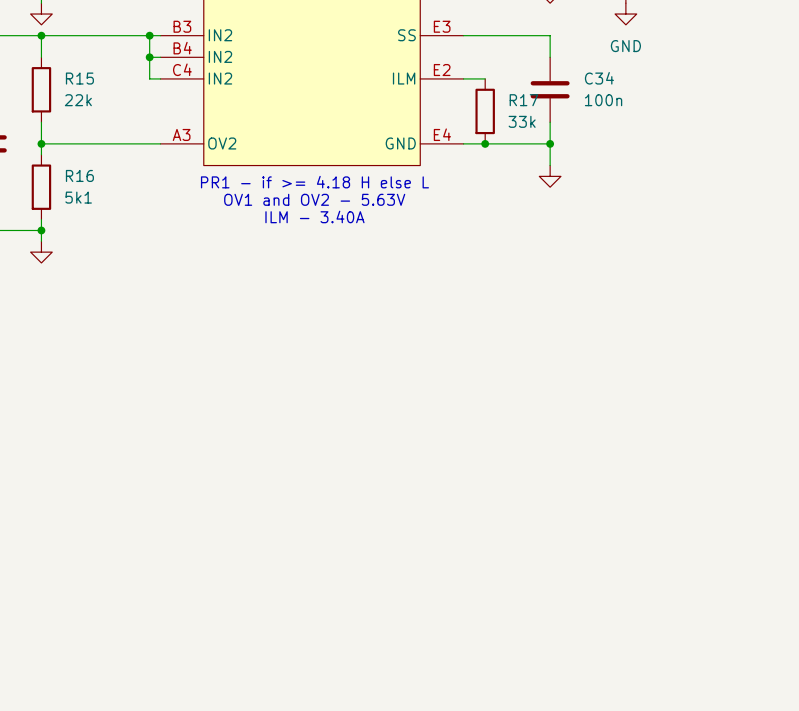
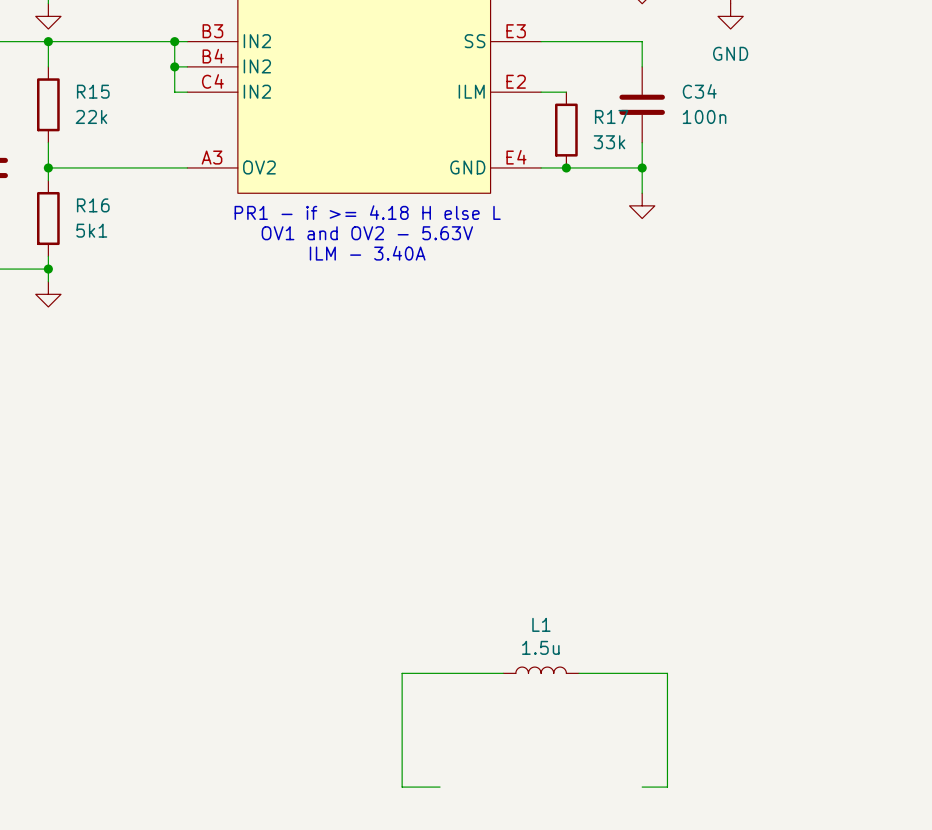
L1: none -> 1.5u (541, 670)
wire: none -> (503, 673) (402, 673) (402, 787) (440, 787)
wire: none -> (579, 673) (667, 673) (667, 787) (642, 787)

